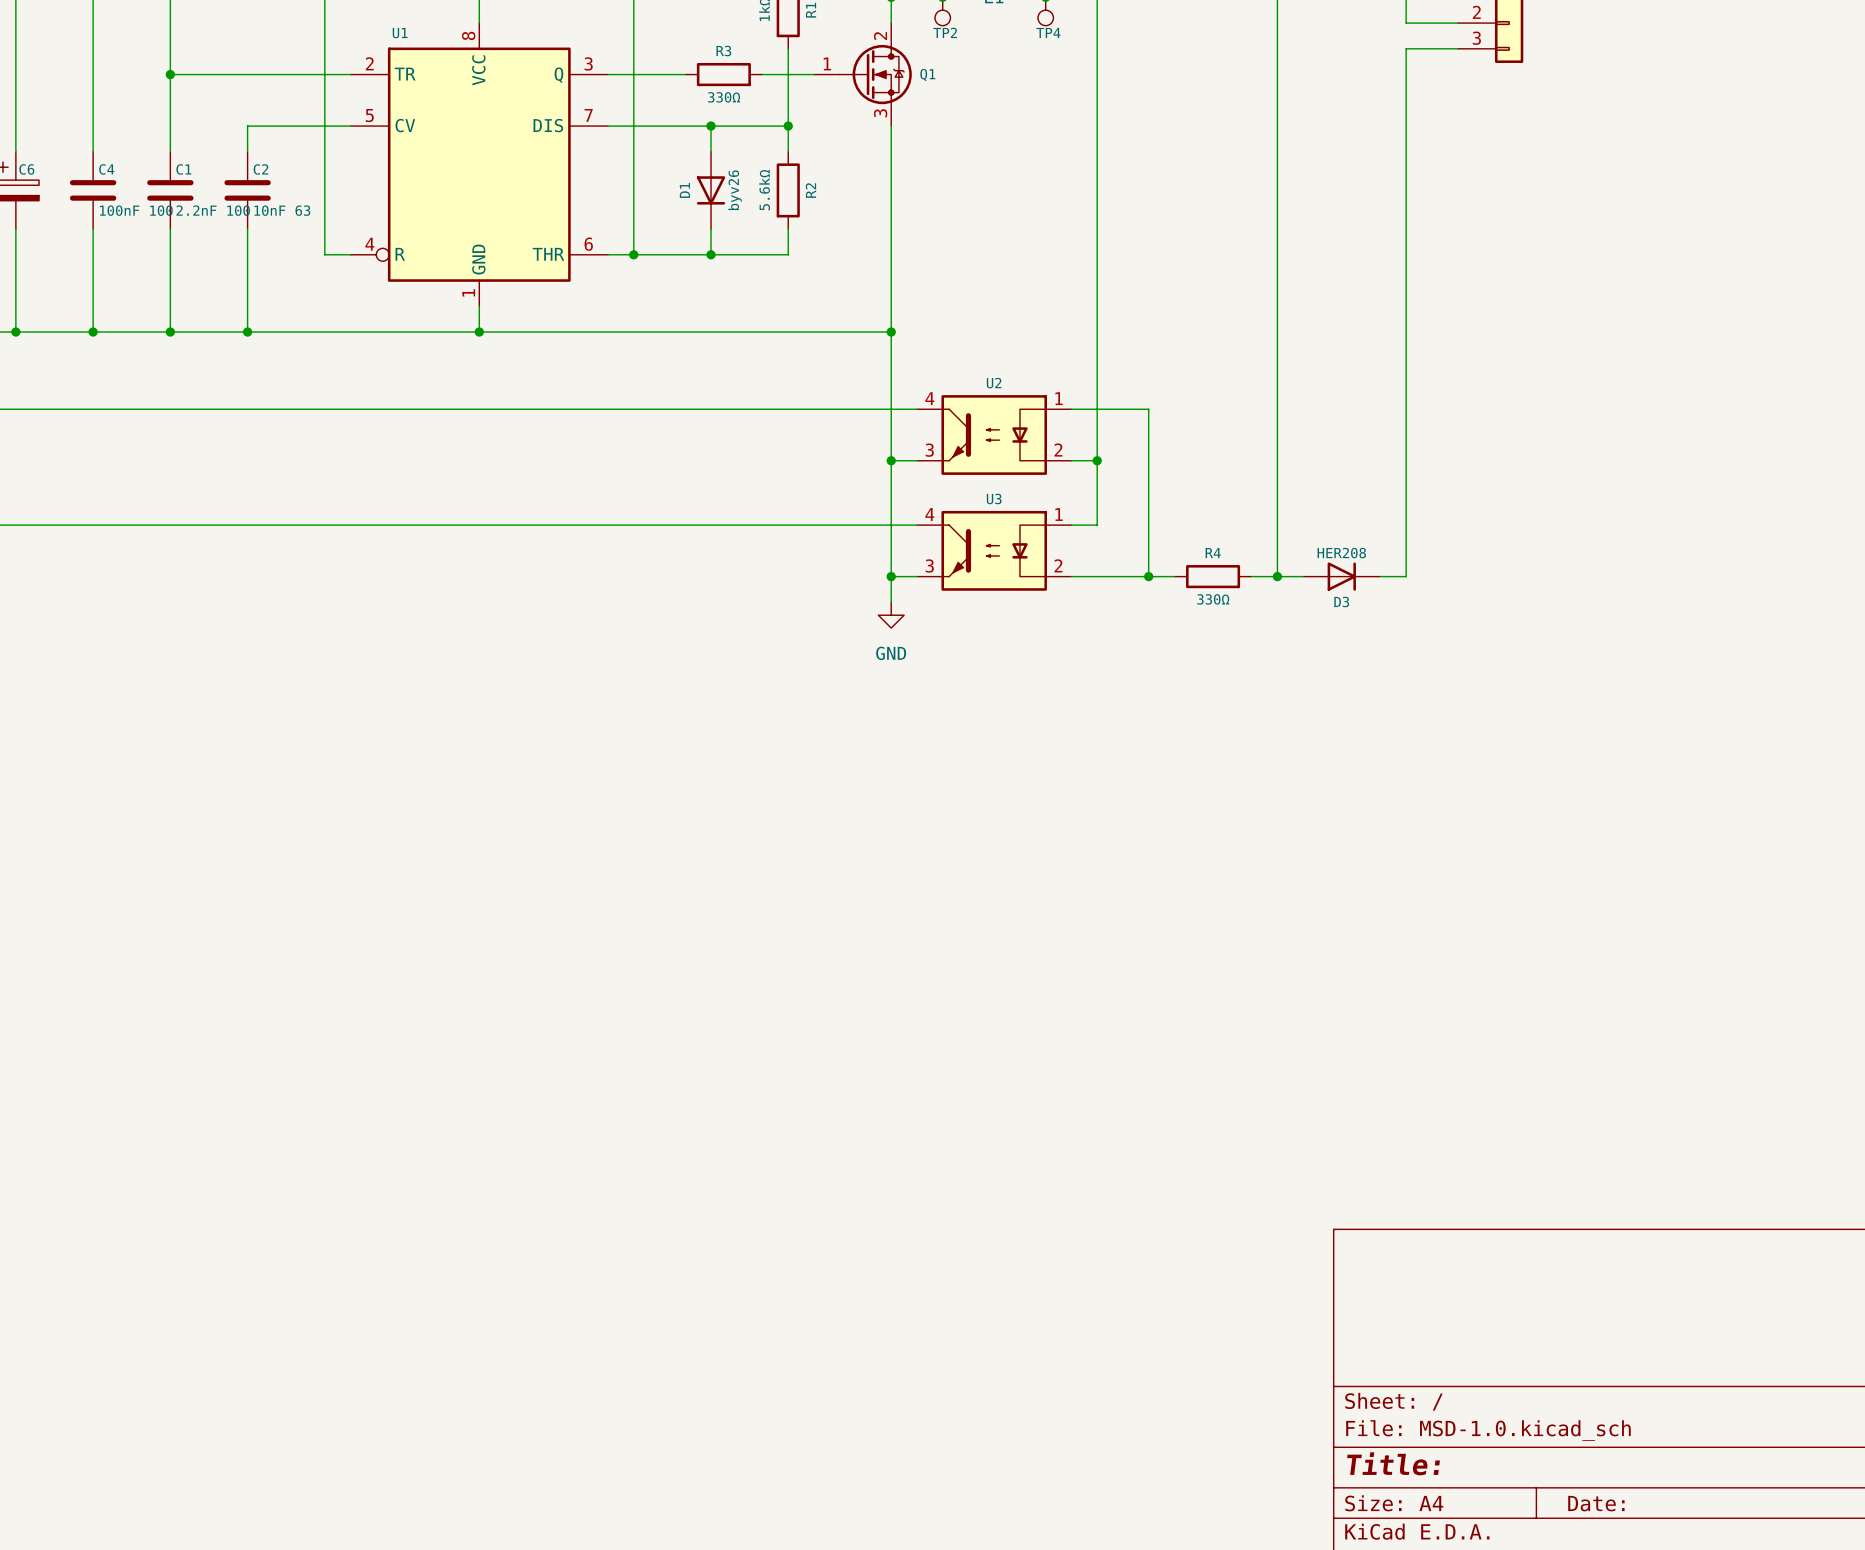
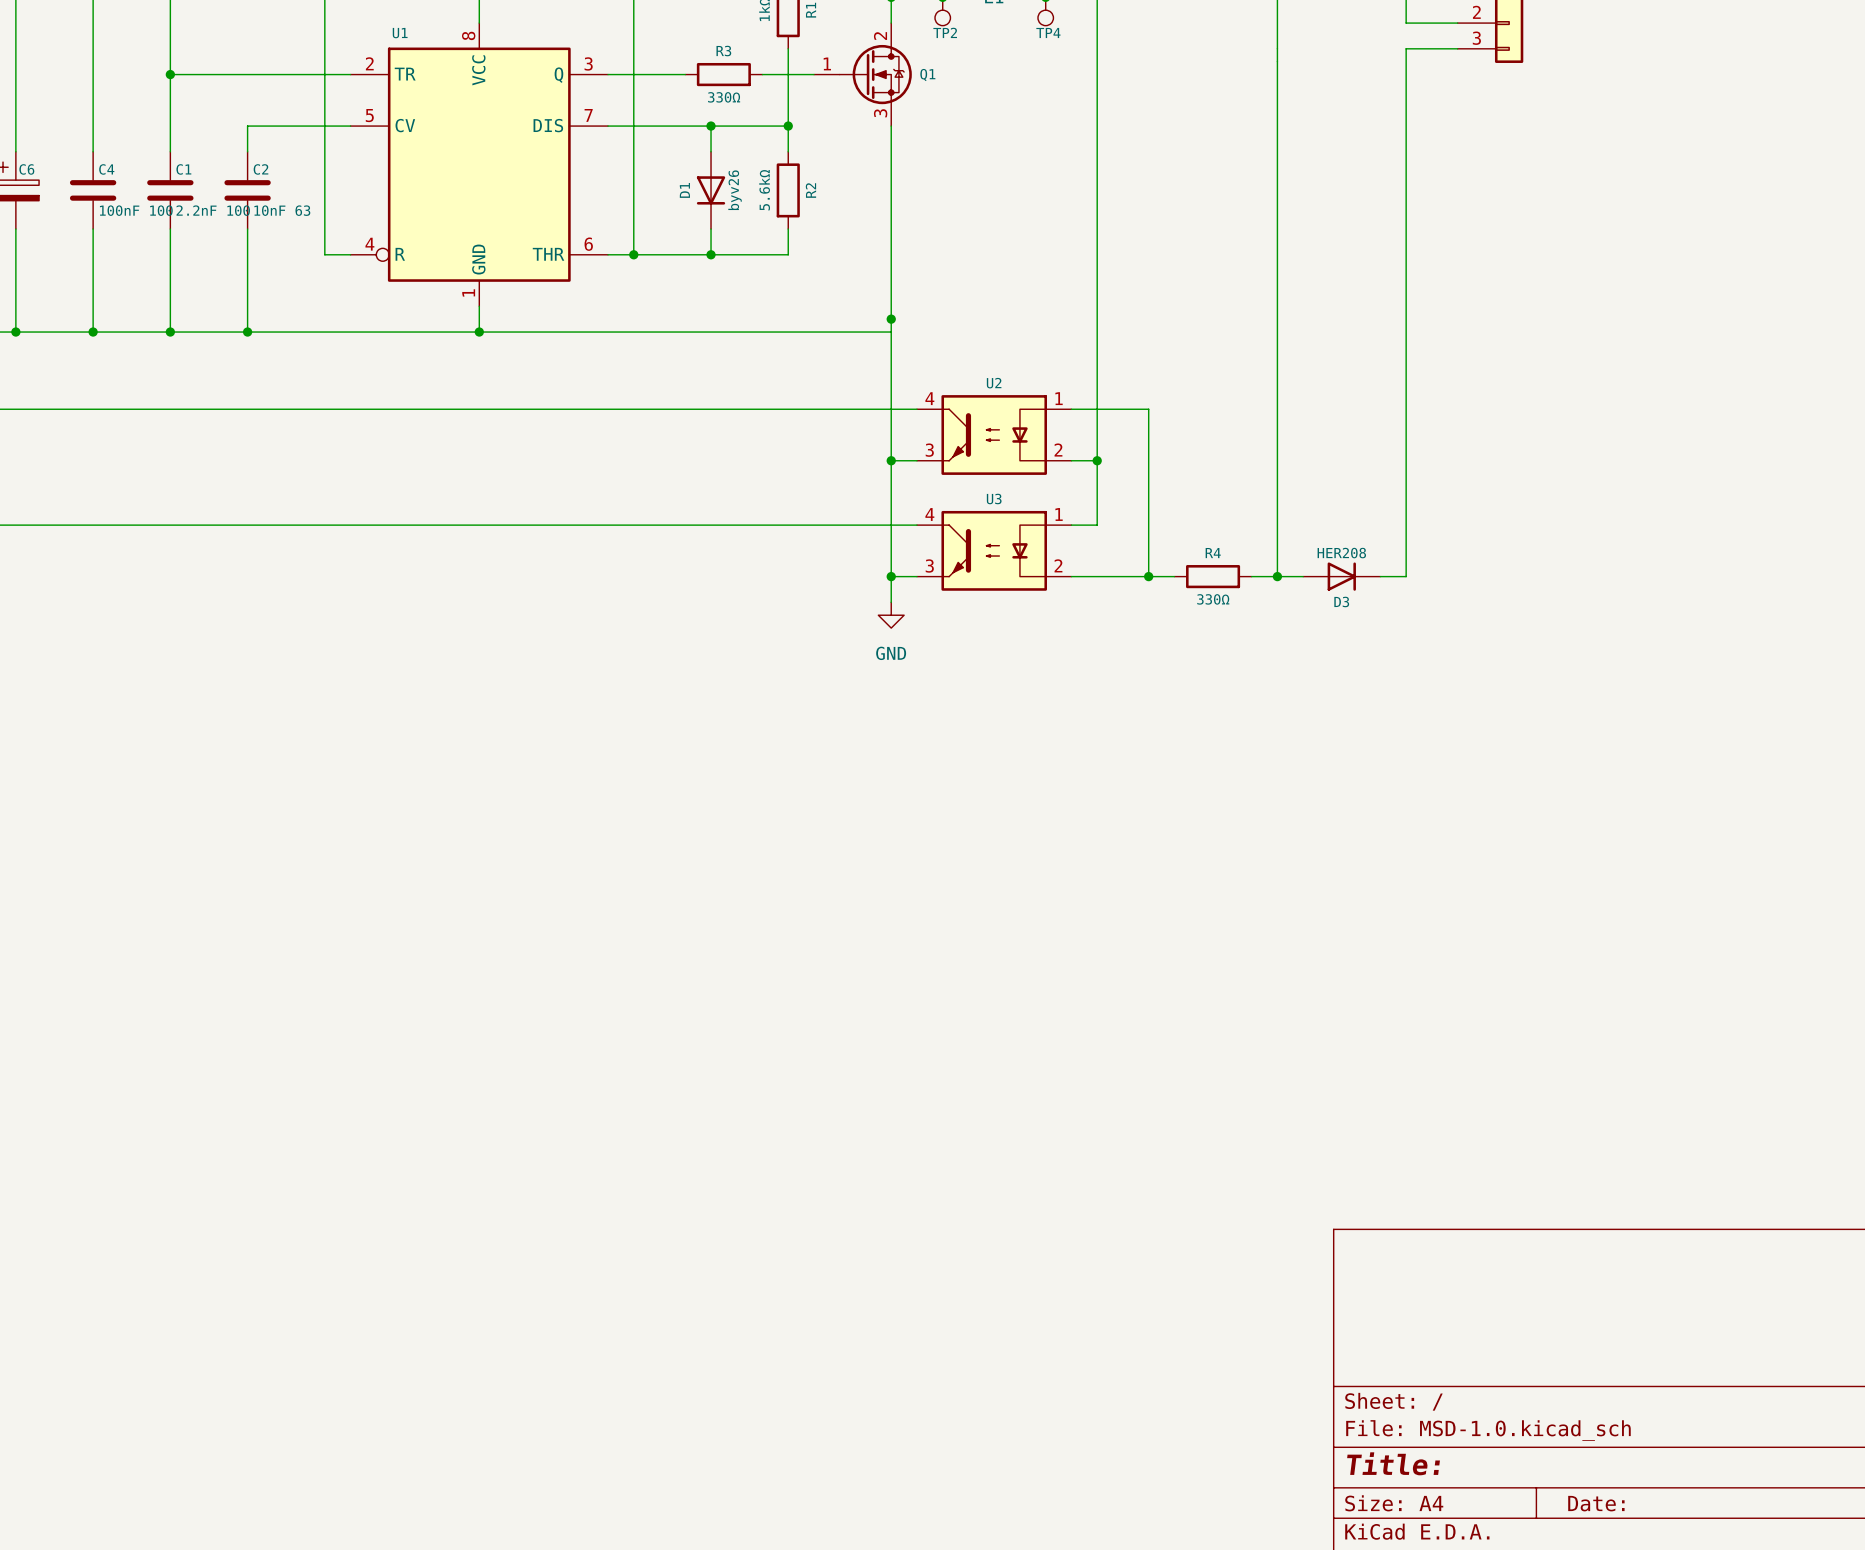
junction position: (891, 332) -> (891, 319)

